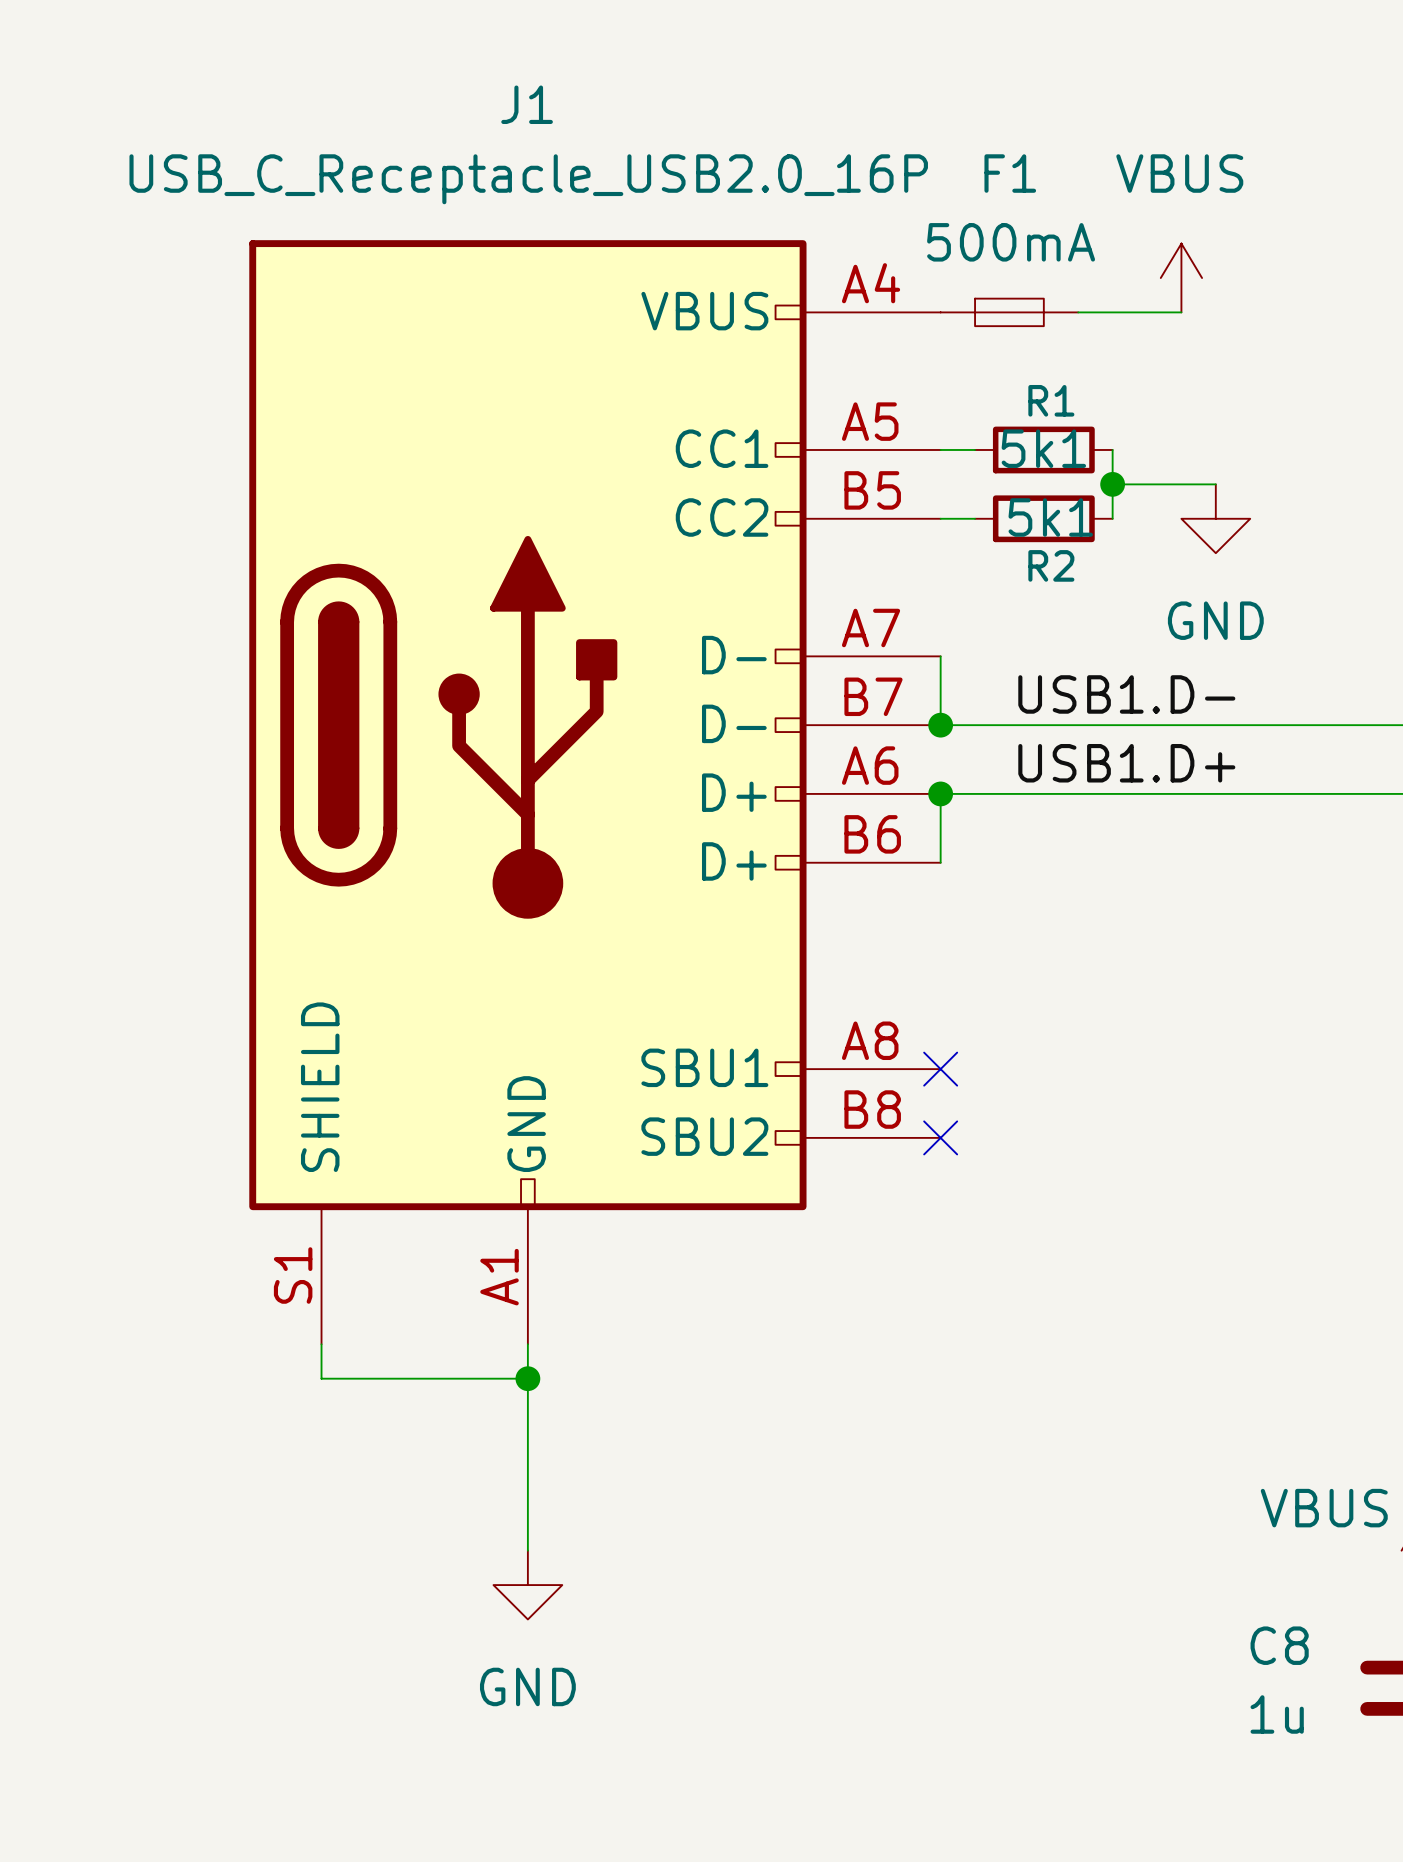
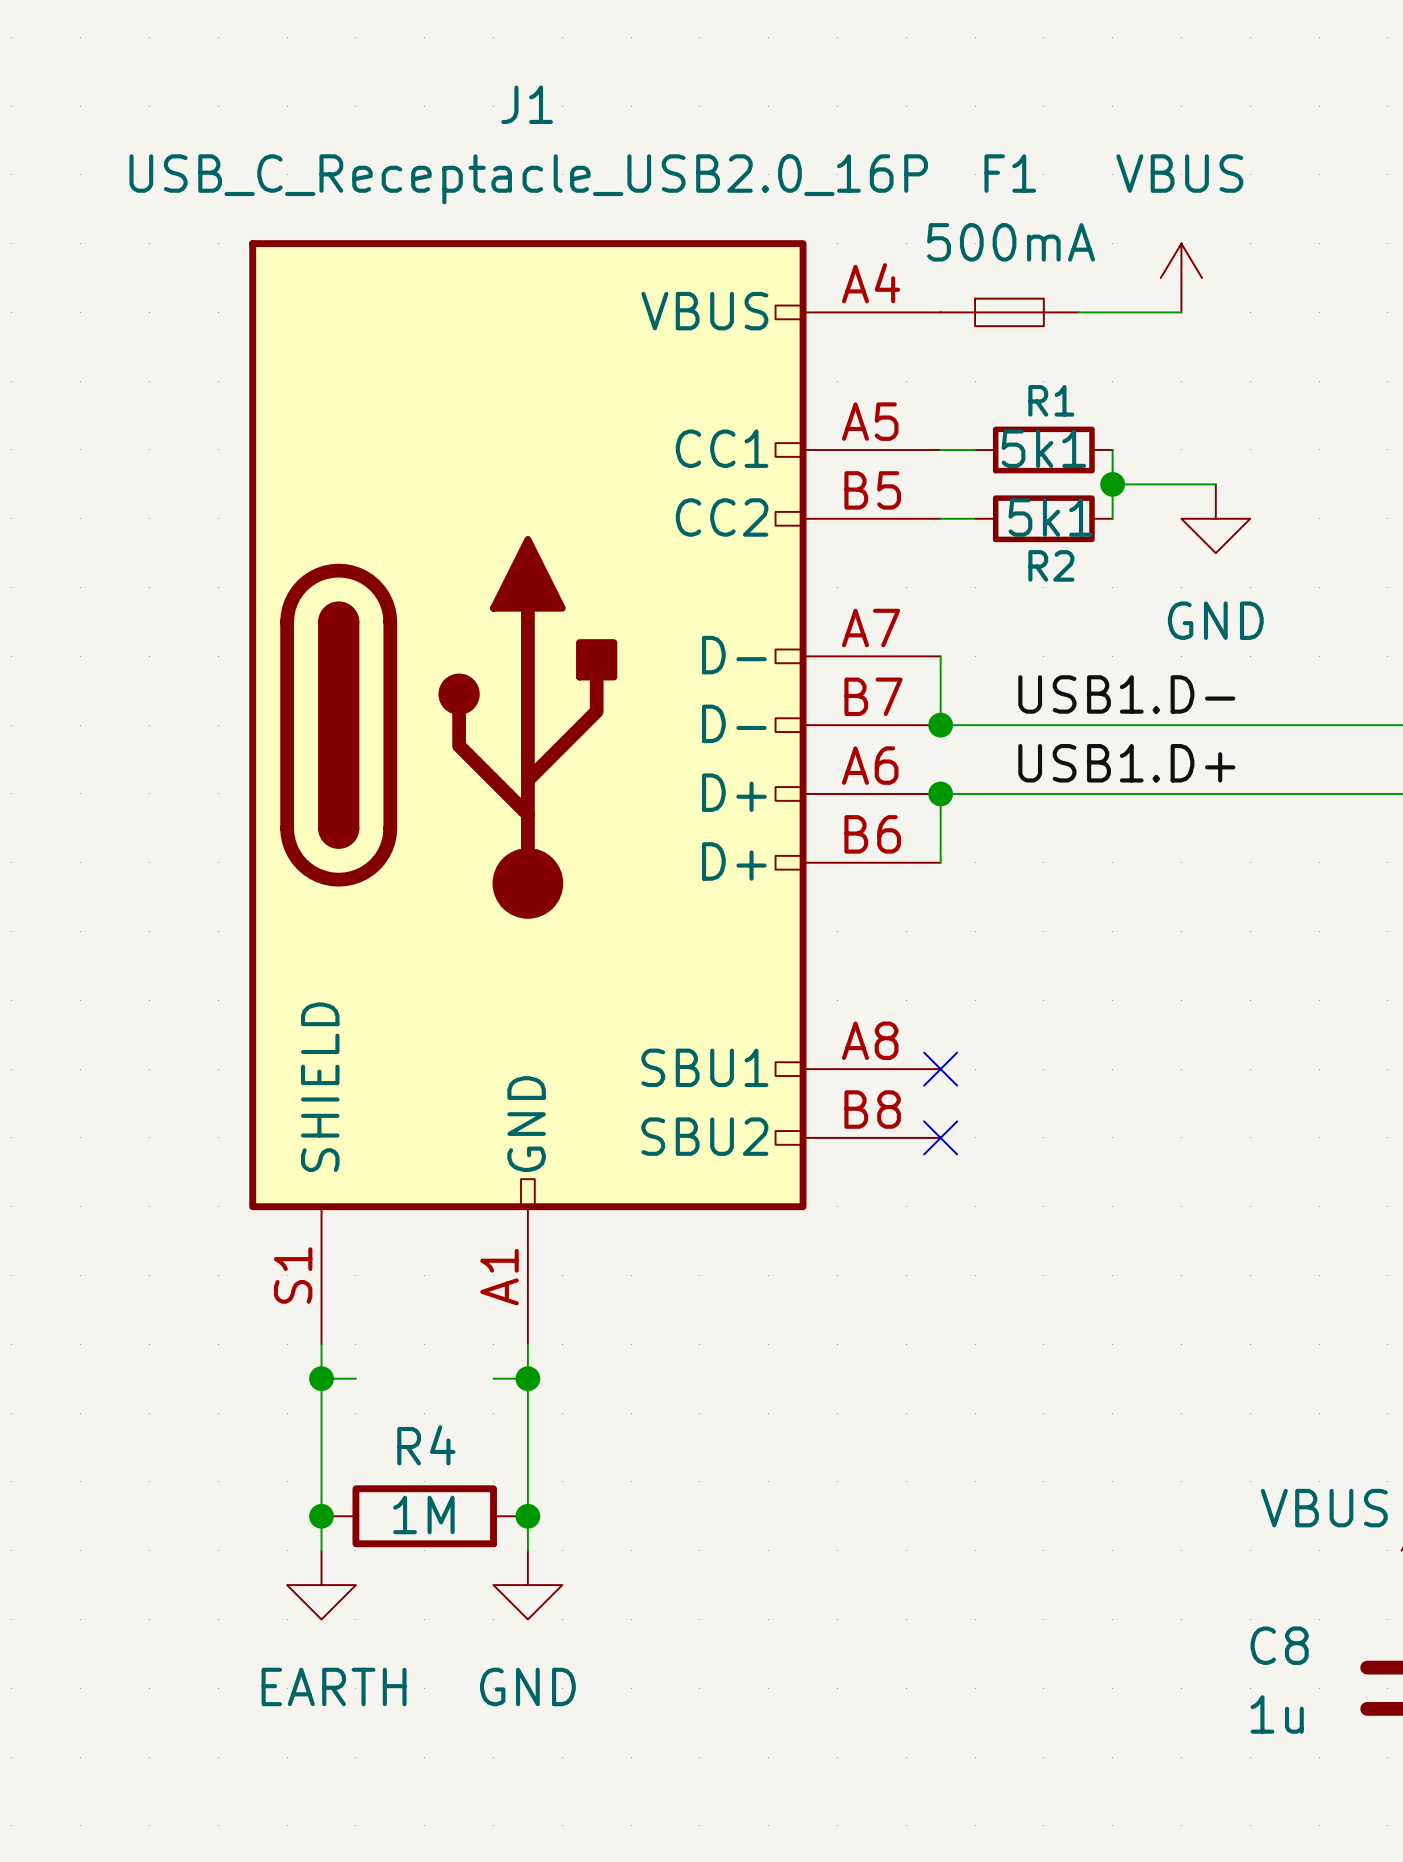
wire: none -> (321, 1378) (321, 1550)
junction: none -> (321, 1378)
wire: (355, 1378) (493, 1378) -> none
junction: none -> (321, 1516)
R4: none -> 1M (424, 1516)
junction: none -> (527, 1516)
power symbol: none -> EARTH (321, 1585)

